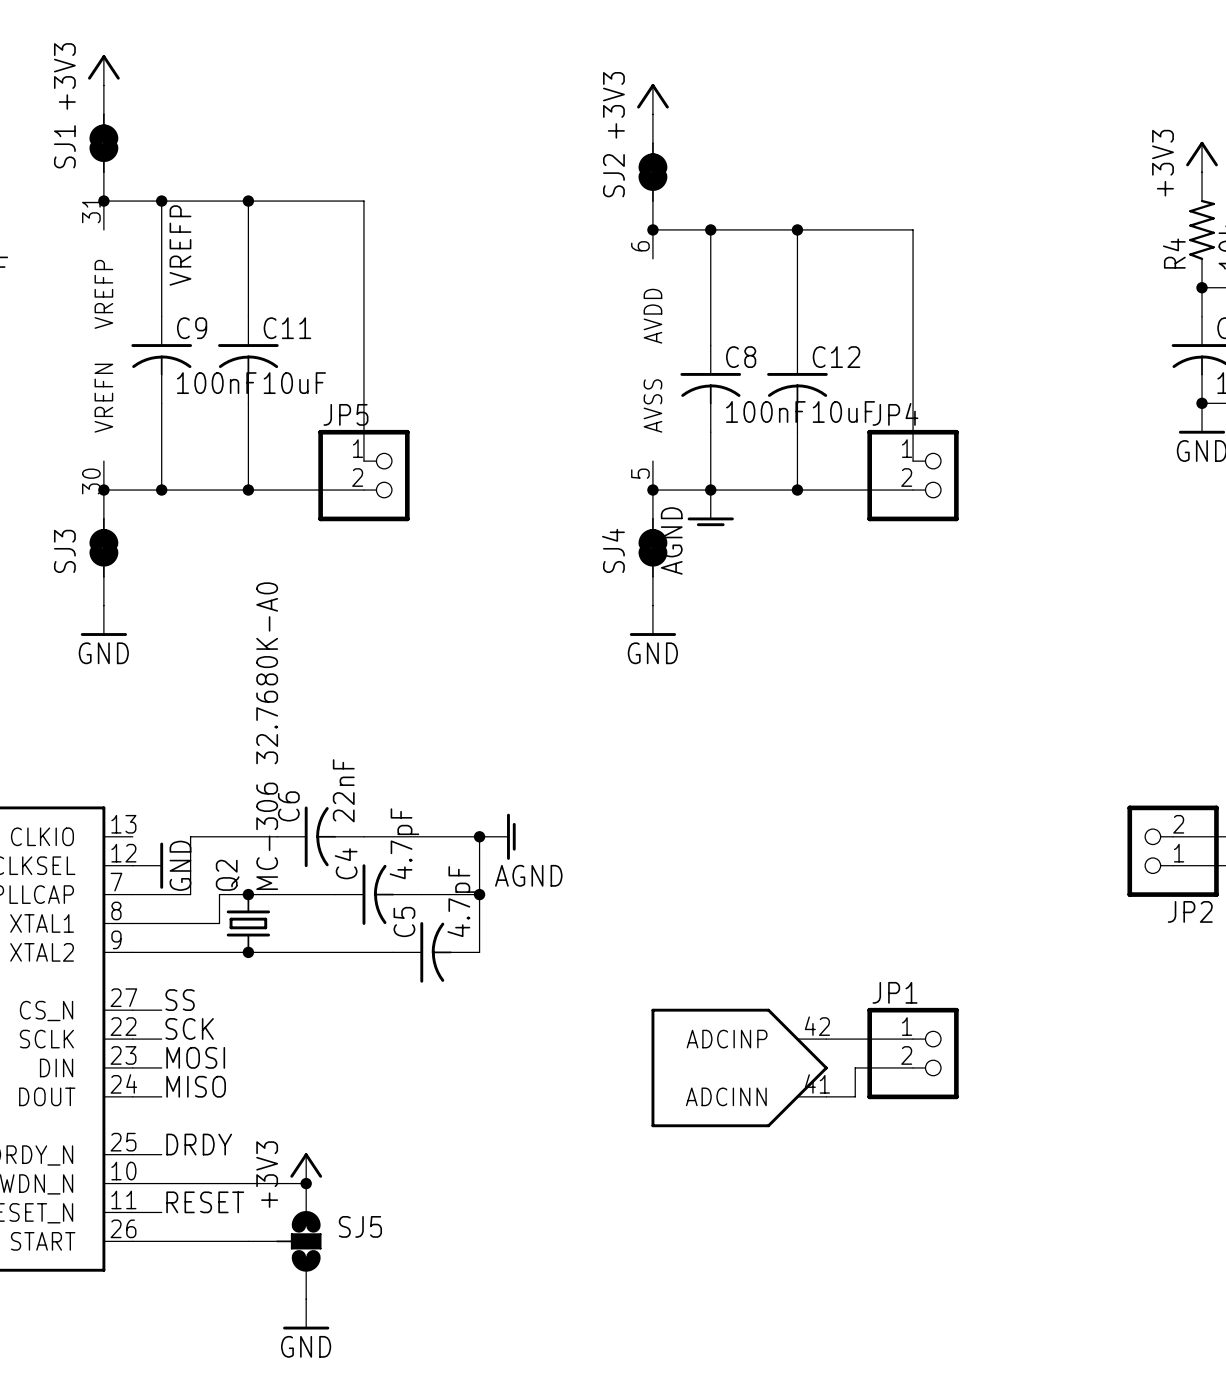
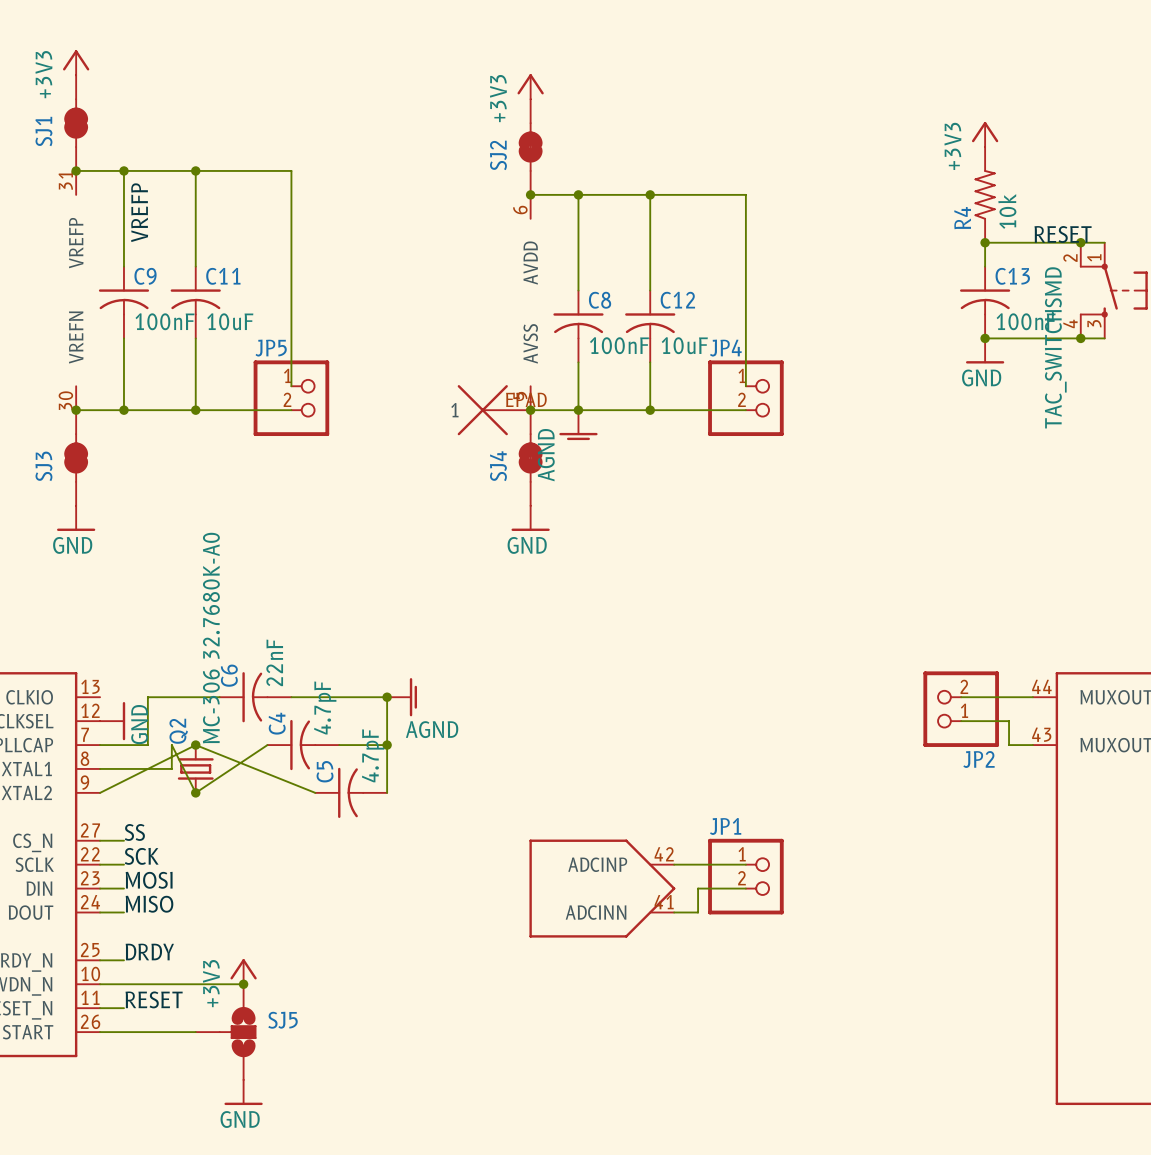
part: none -> (494, 410)
wire: (219, 894) (335, 894) -> (171, 745) (195, 792) (267, 745)
wire: (132, 952) (392, 952) -> (100, 792) (195, 745) (315, 792)

